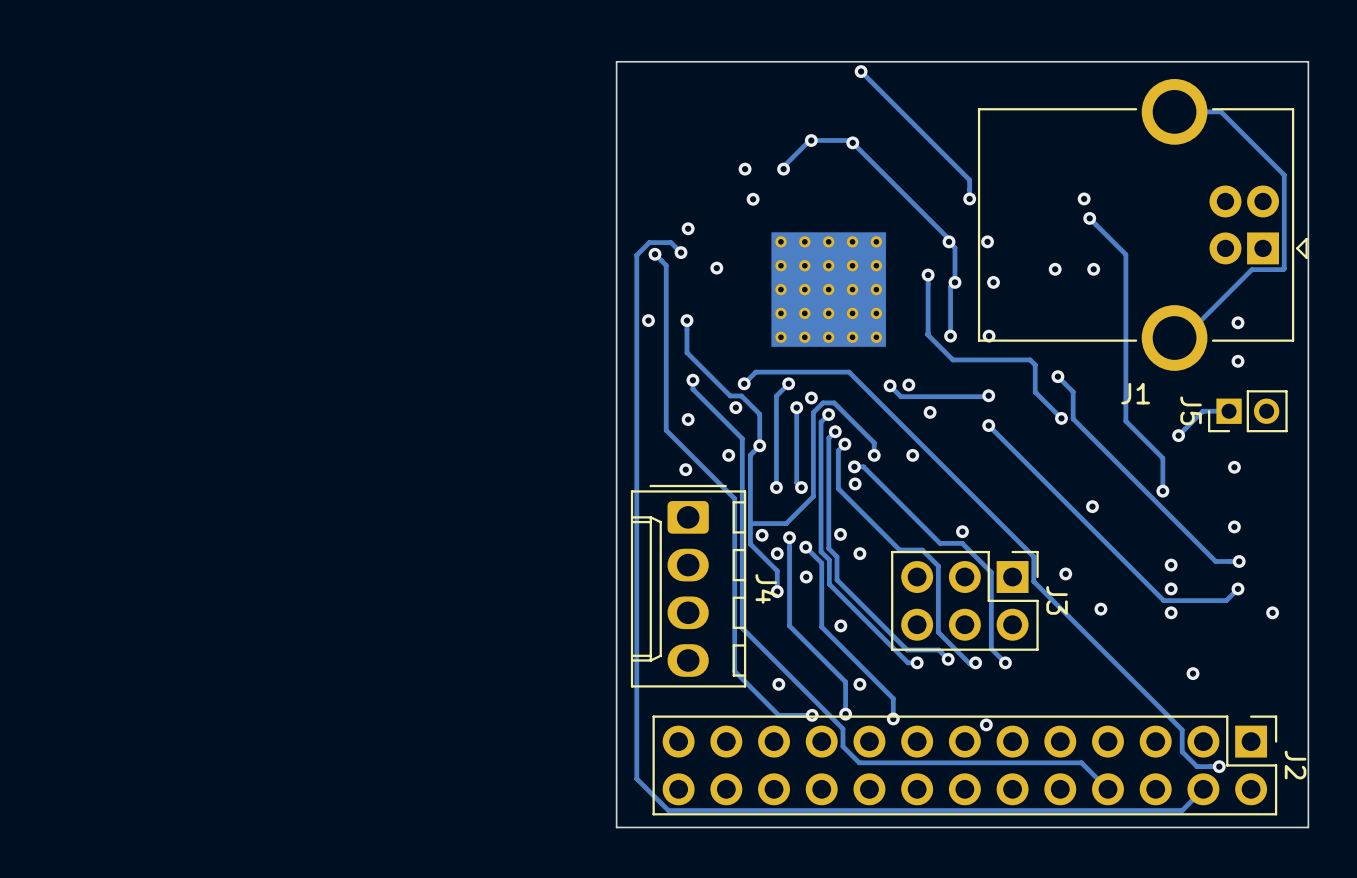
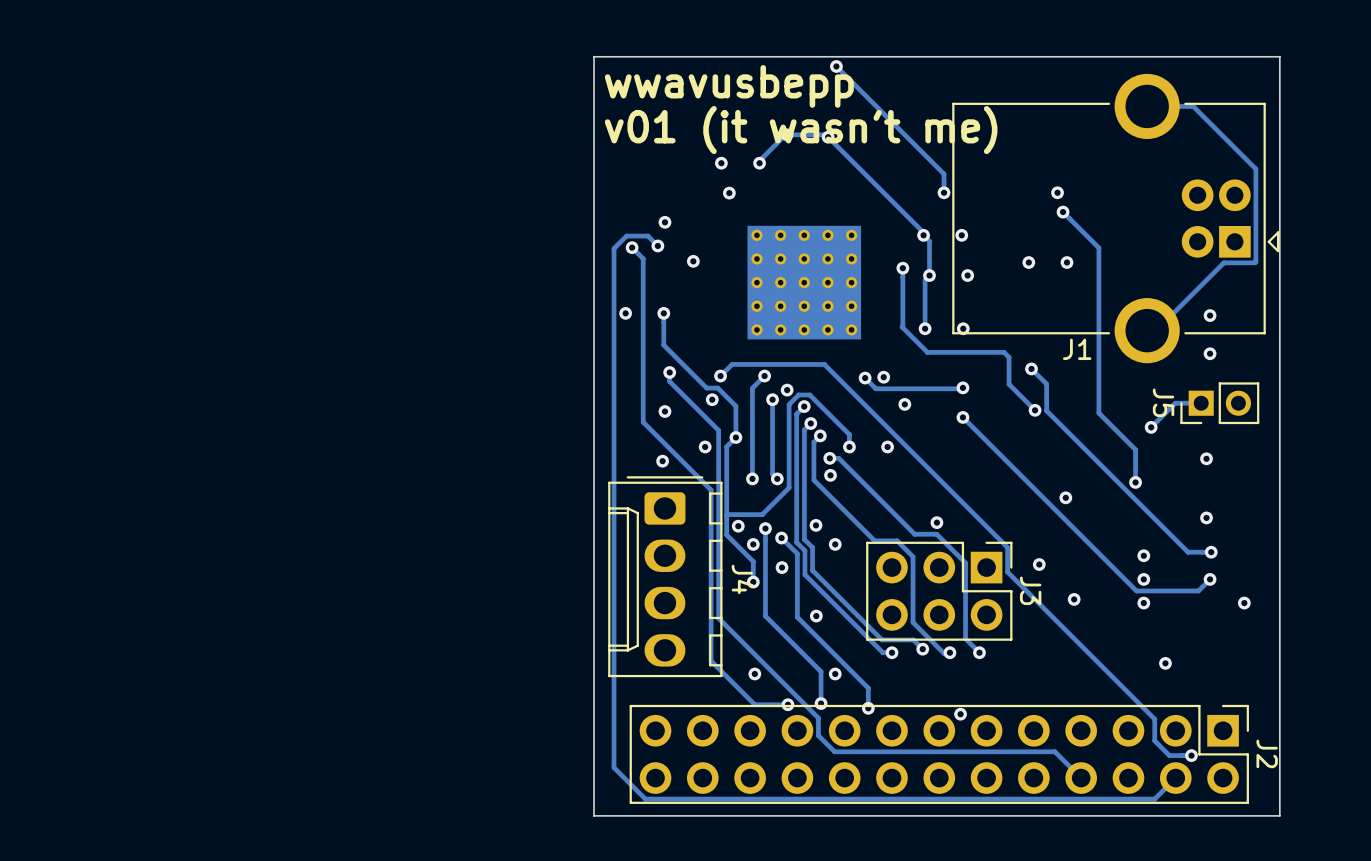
text: none -> wwavusbepp (729, 86)
text: none -> v01 (it wasn't me) (801, 130)
J1 name position: J1 (1135, 393) -> J1 (1077, 349)

